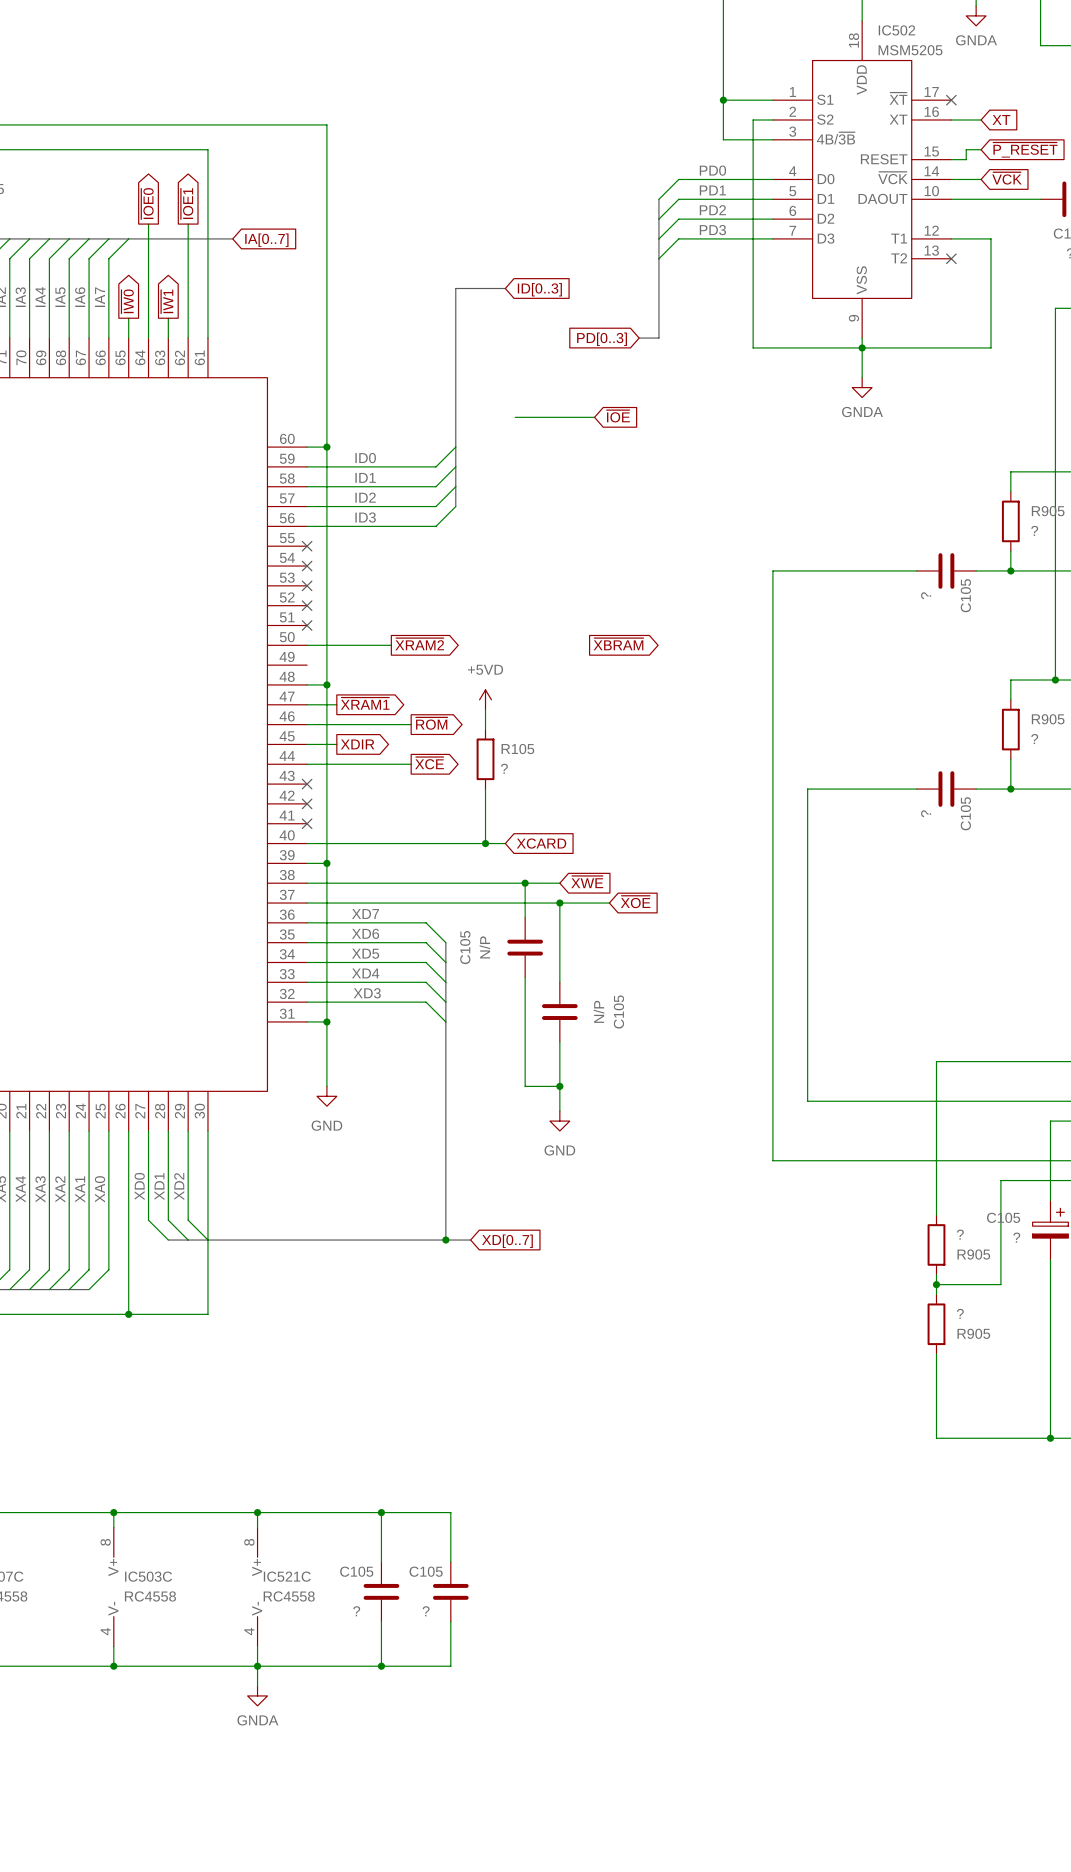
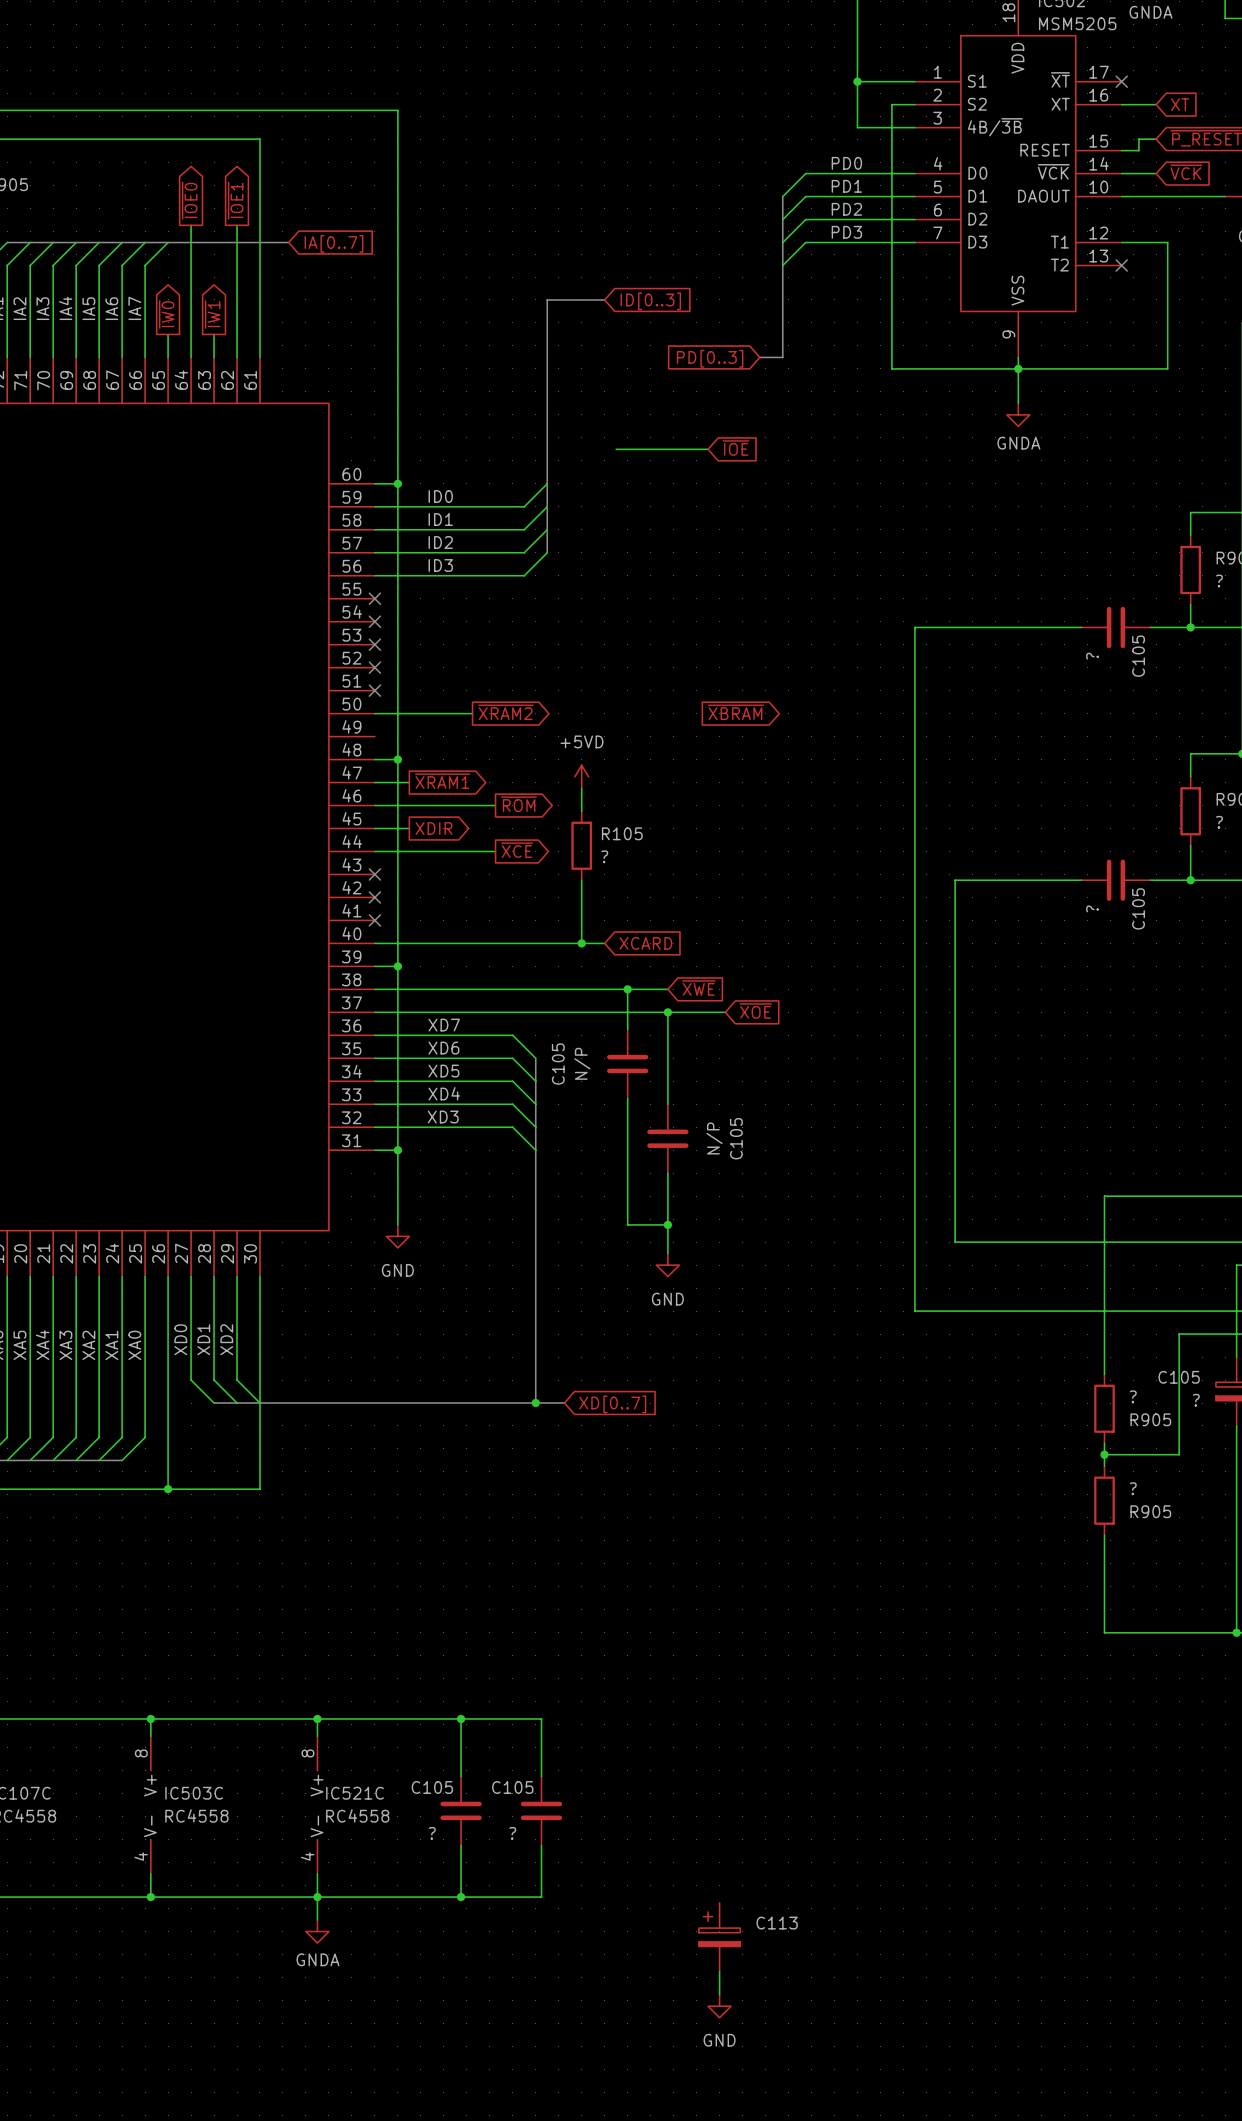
C113: none -> (719, 1937)
wire: none -> (719, 1971) (719, 1994)
power symbol: none -> GND (719, 2006)

